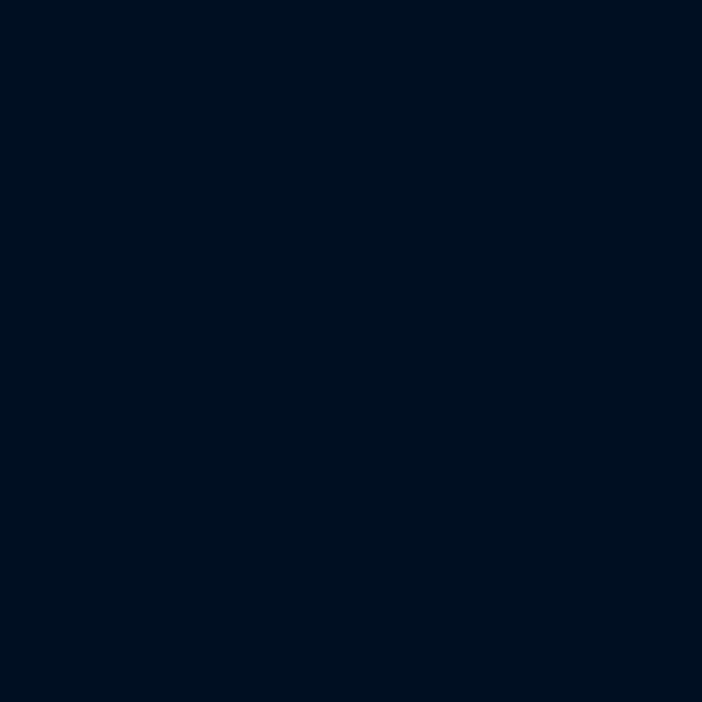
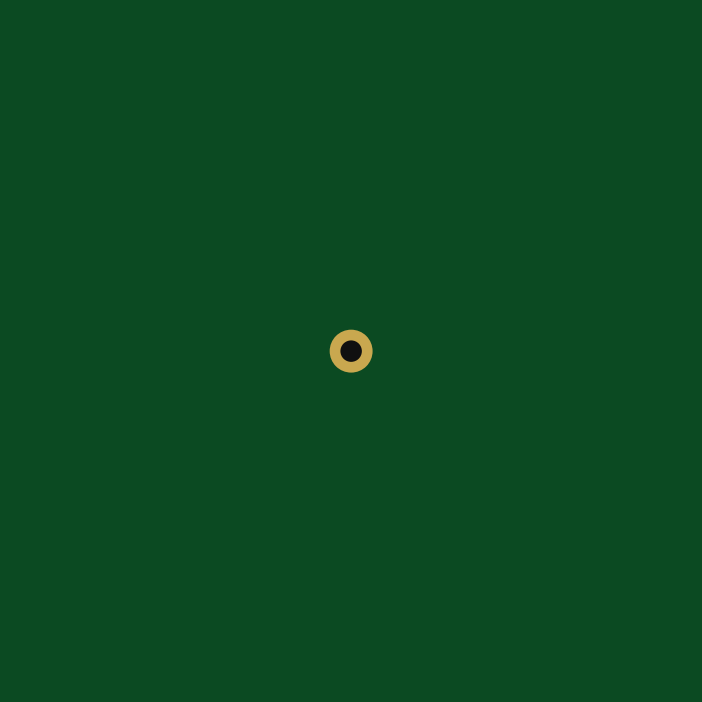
via: none -> (351, 351)

